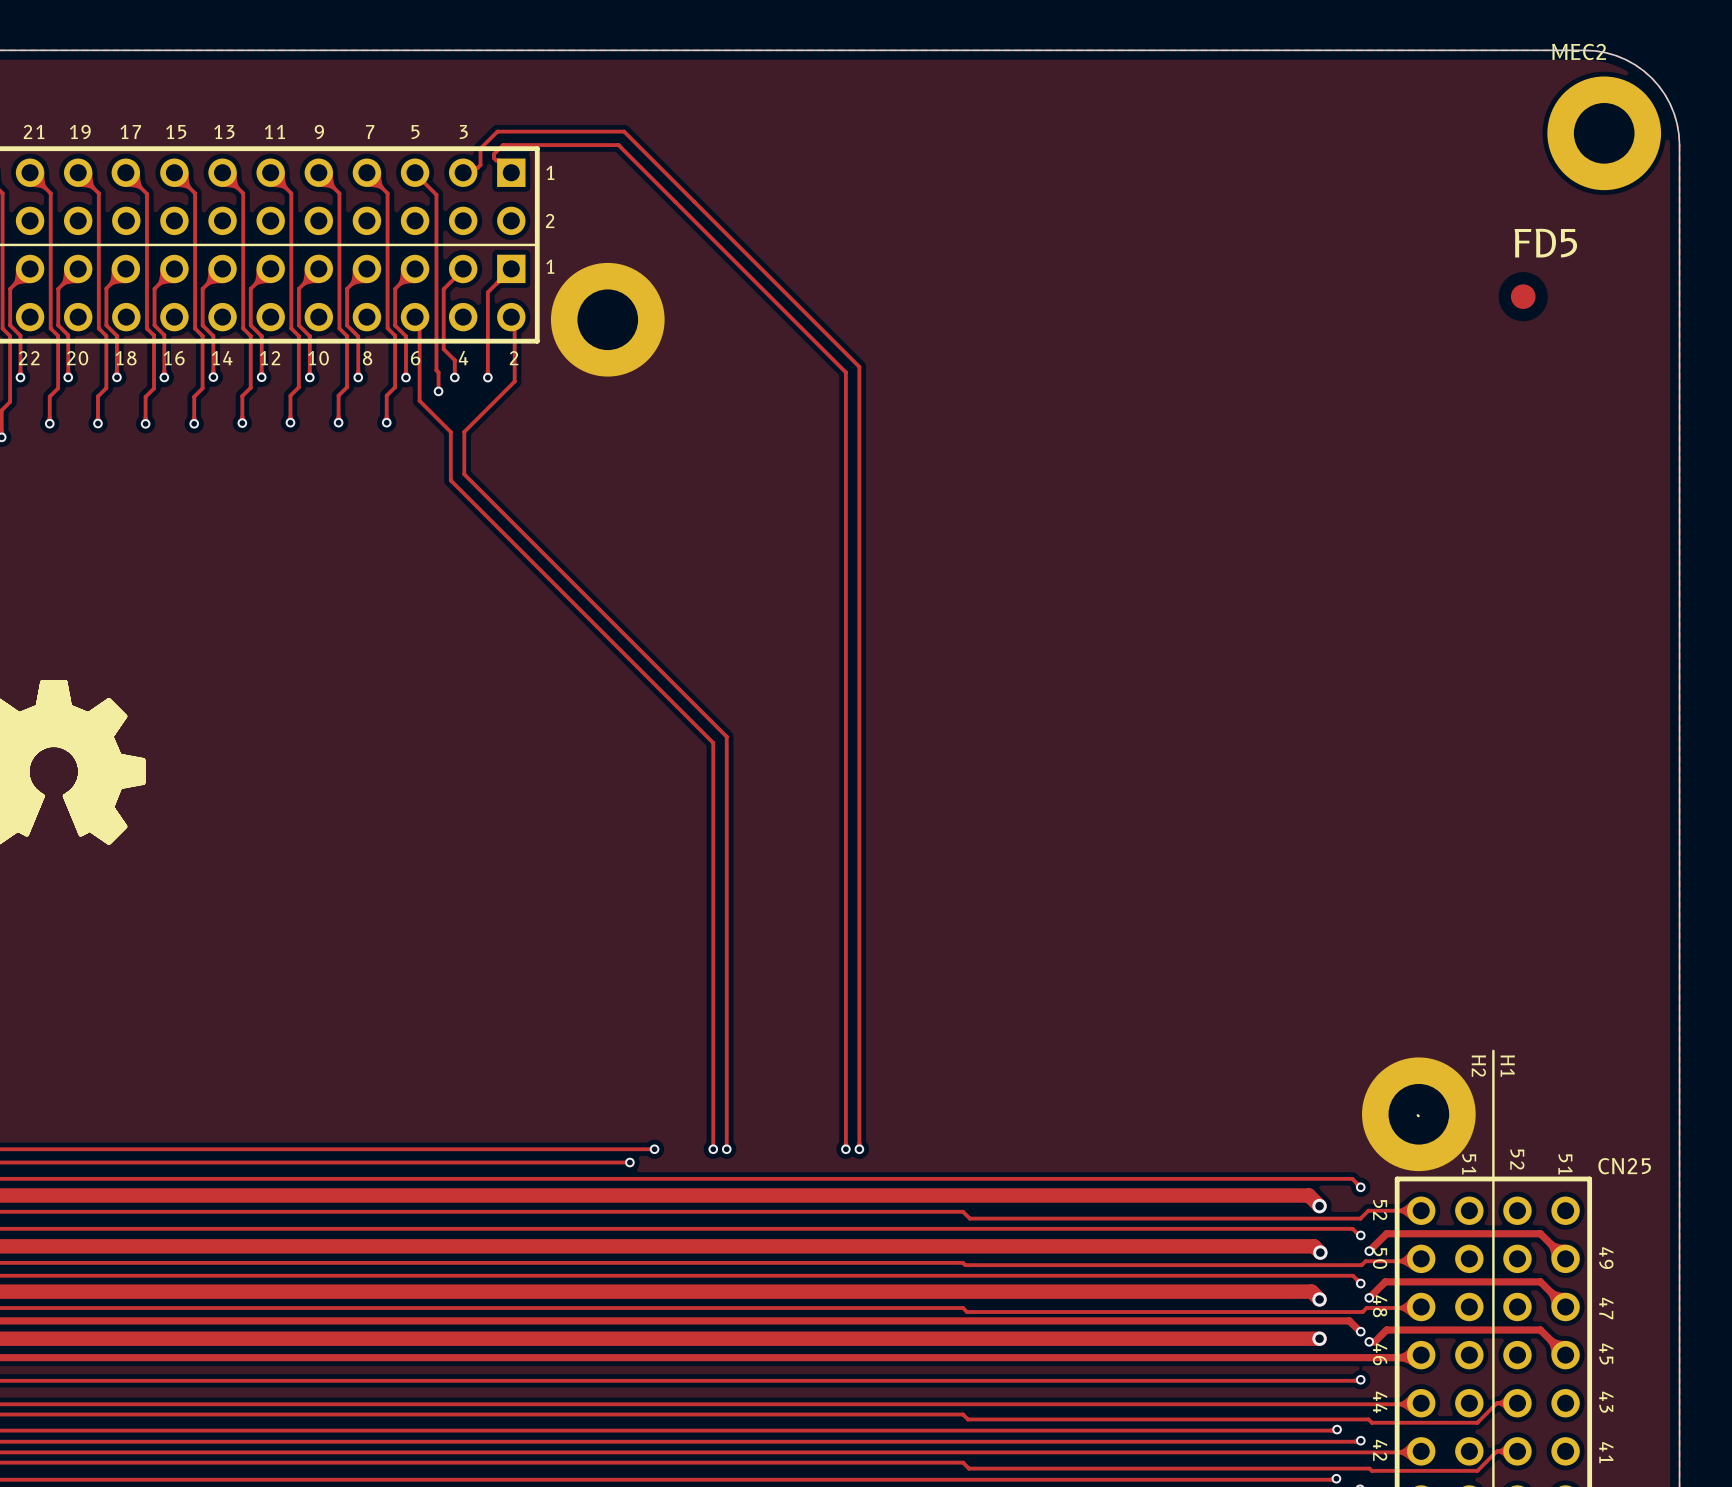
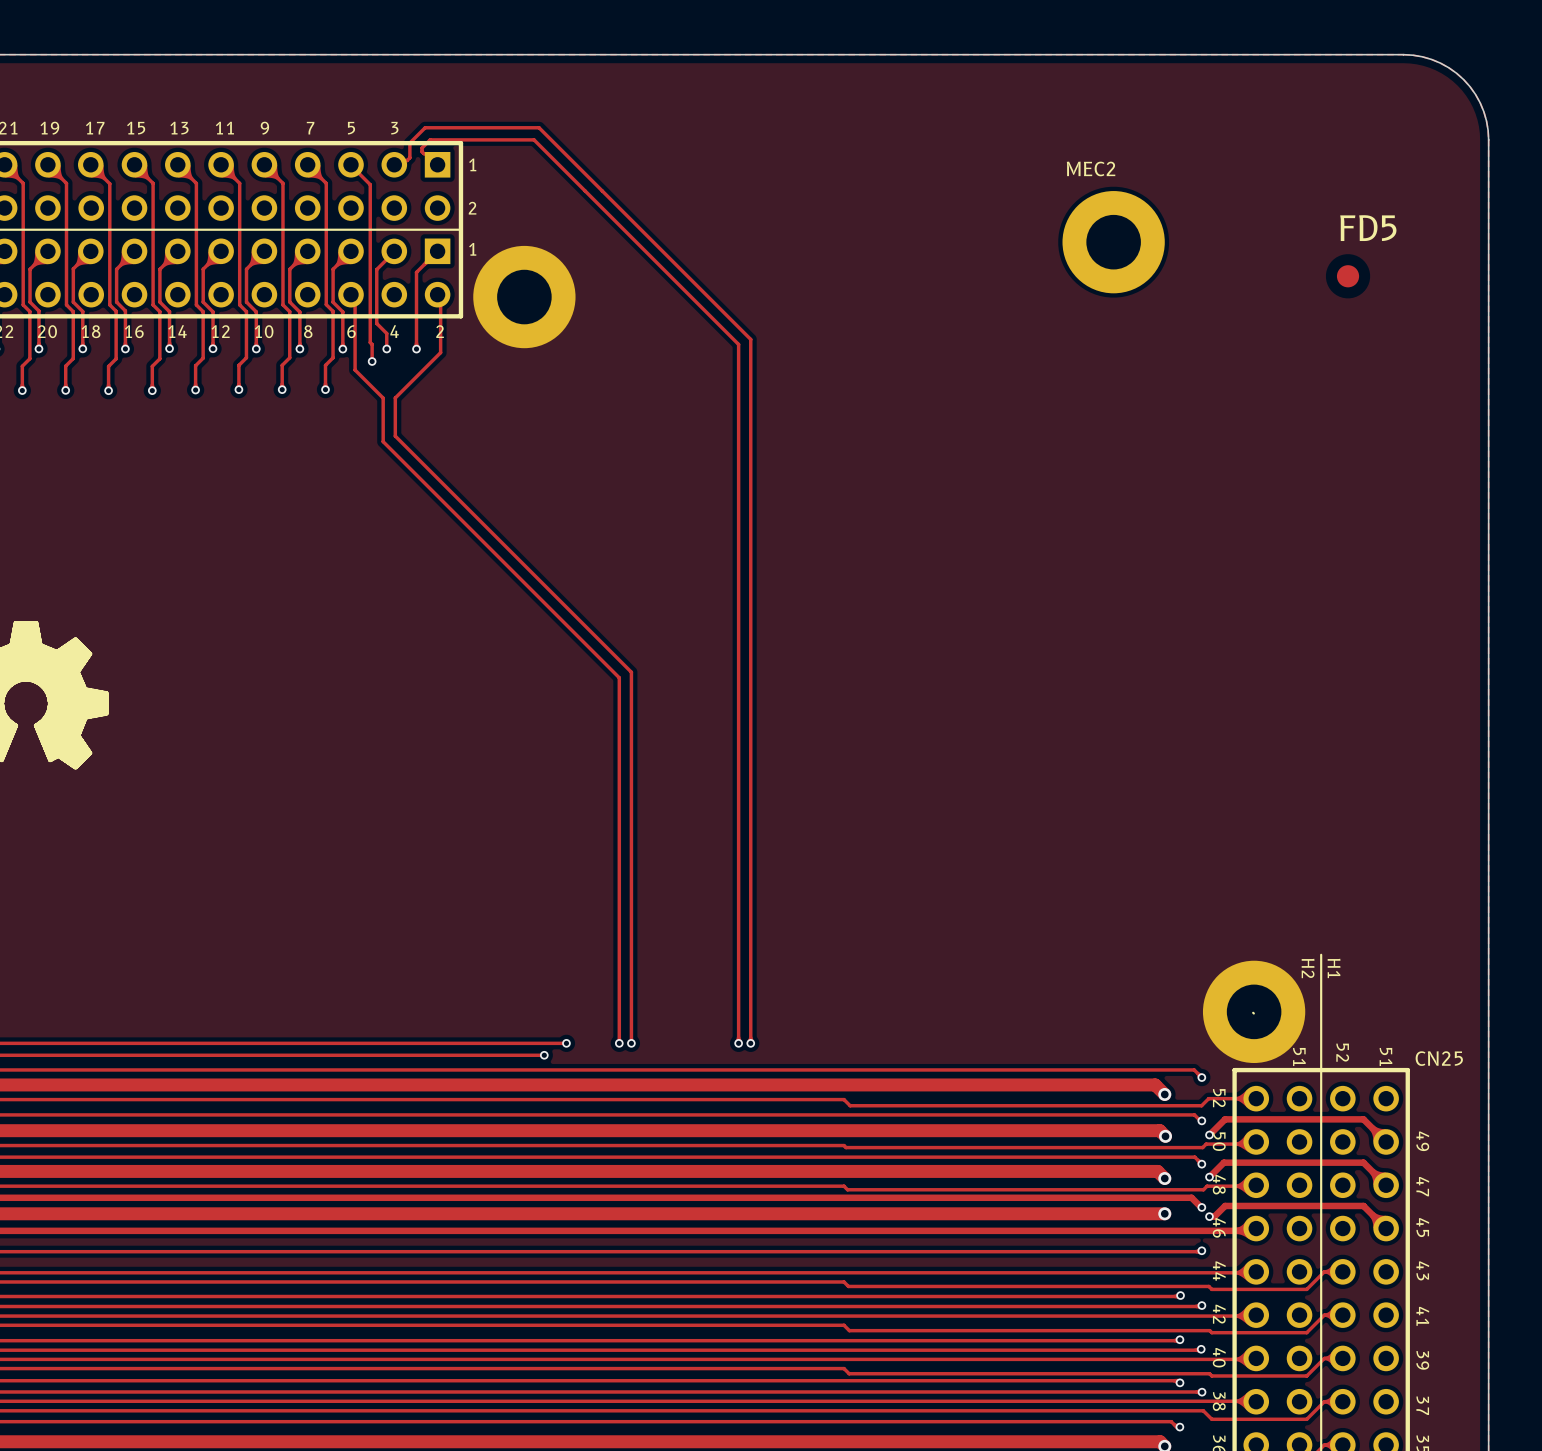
MEC2 position: (1604, 133) -> (1113, 242)

